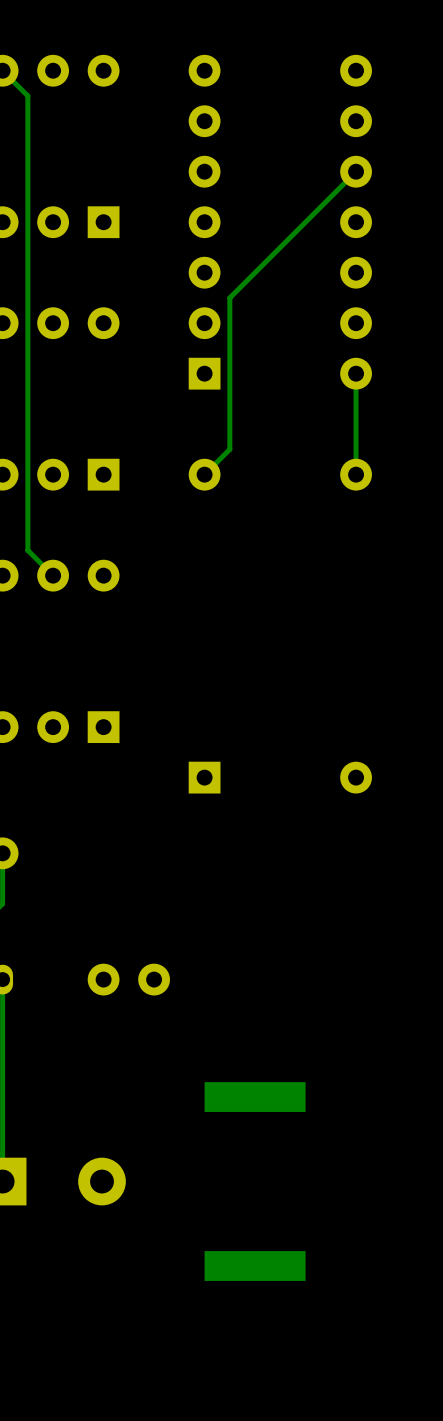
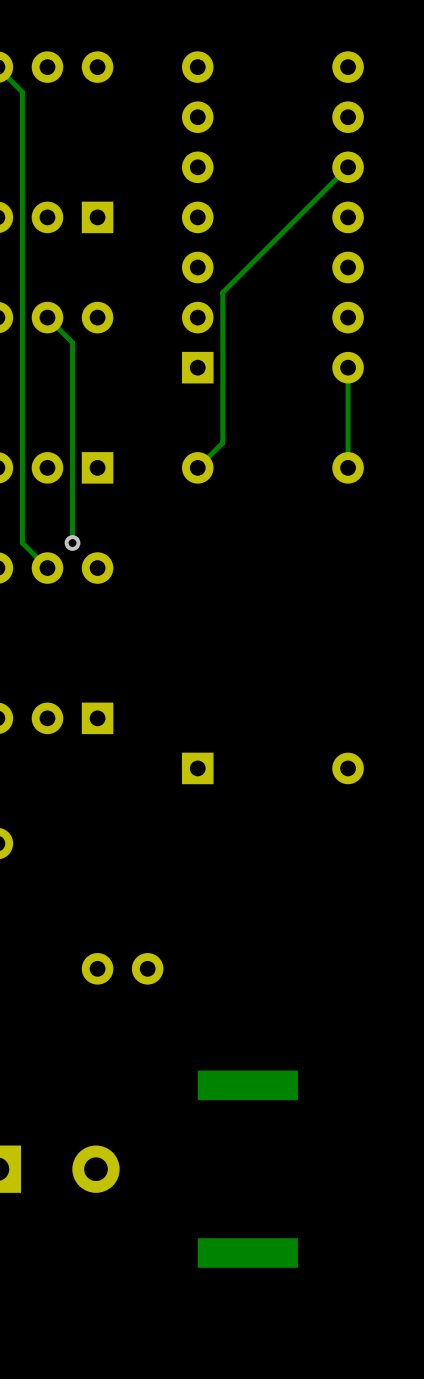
track: none -> (47, 317) (72, 342) (72, 543)
via: none -> (72, 543)

